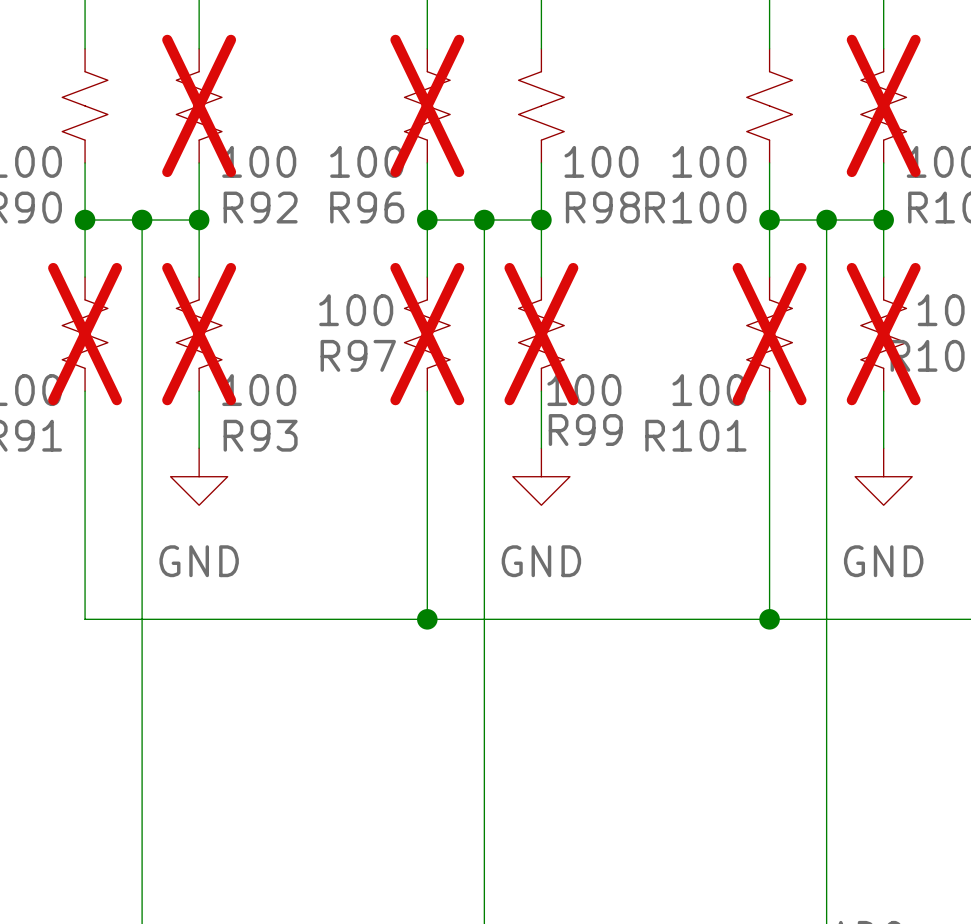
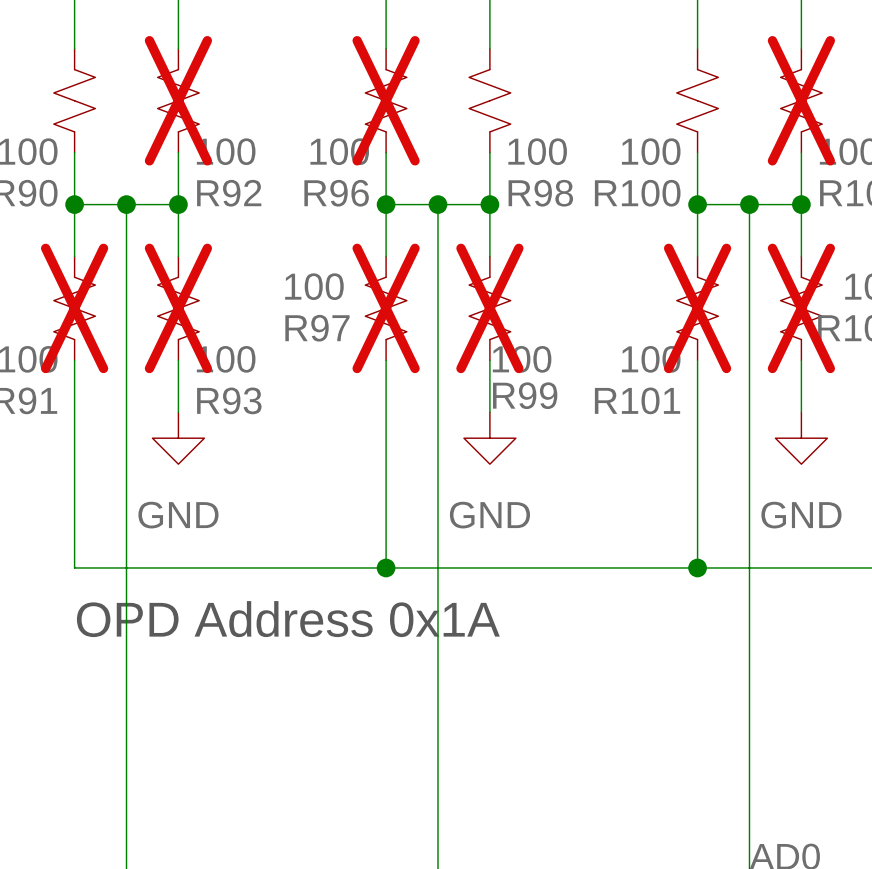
text: none -> OPD Address 0x1A (288, 619)

